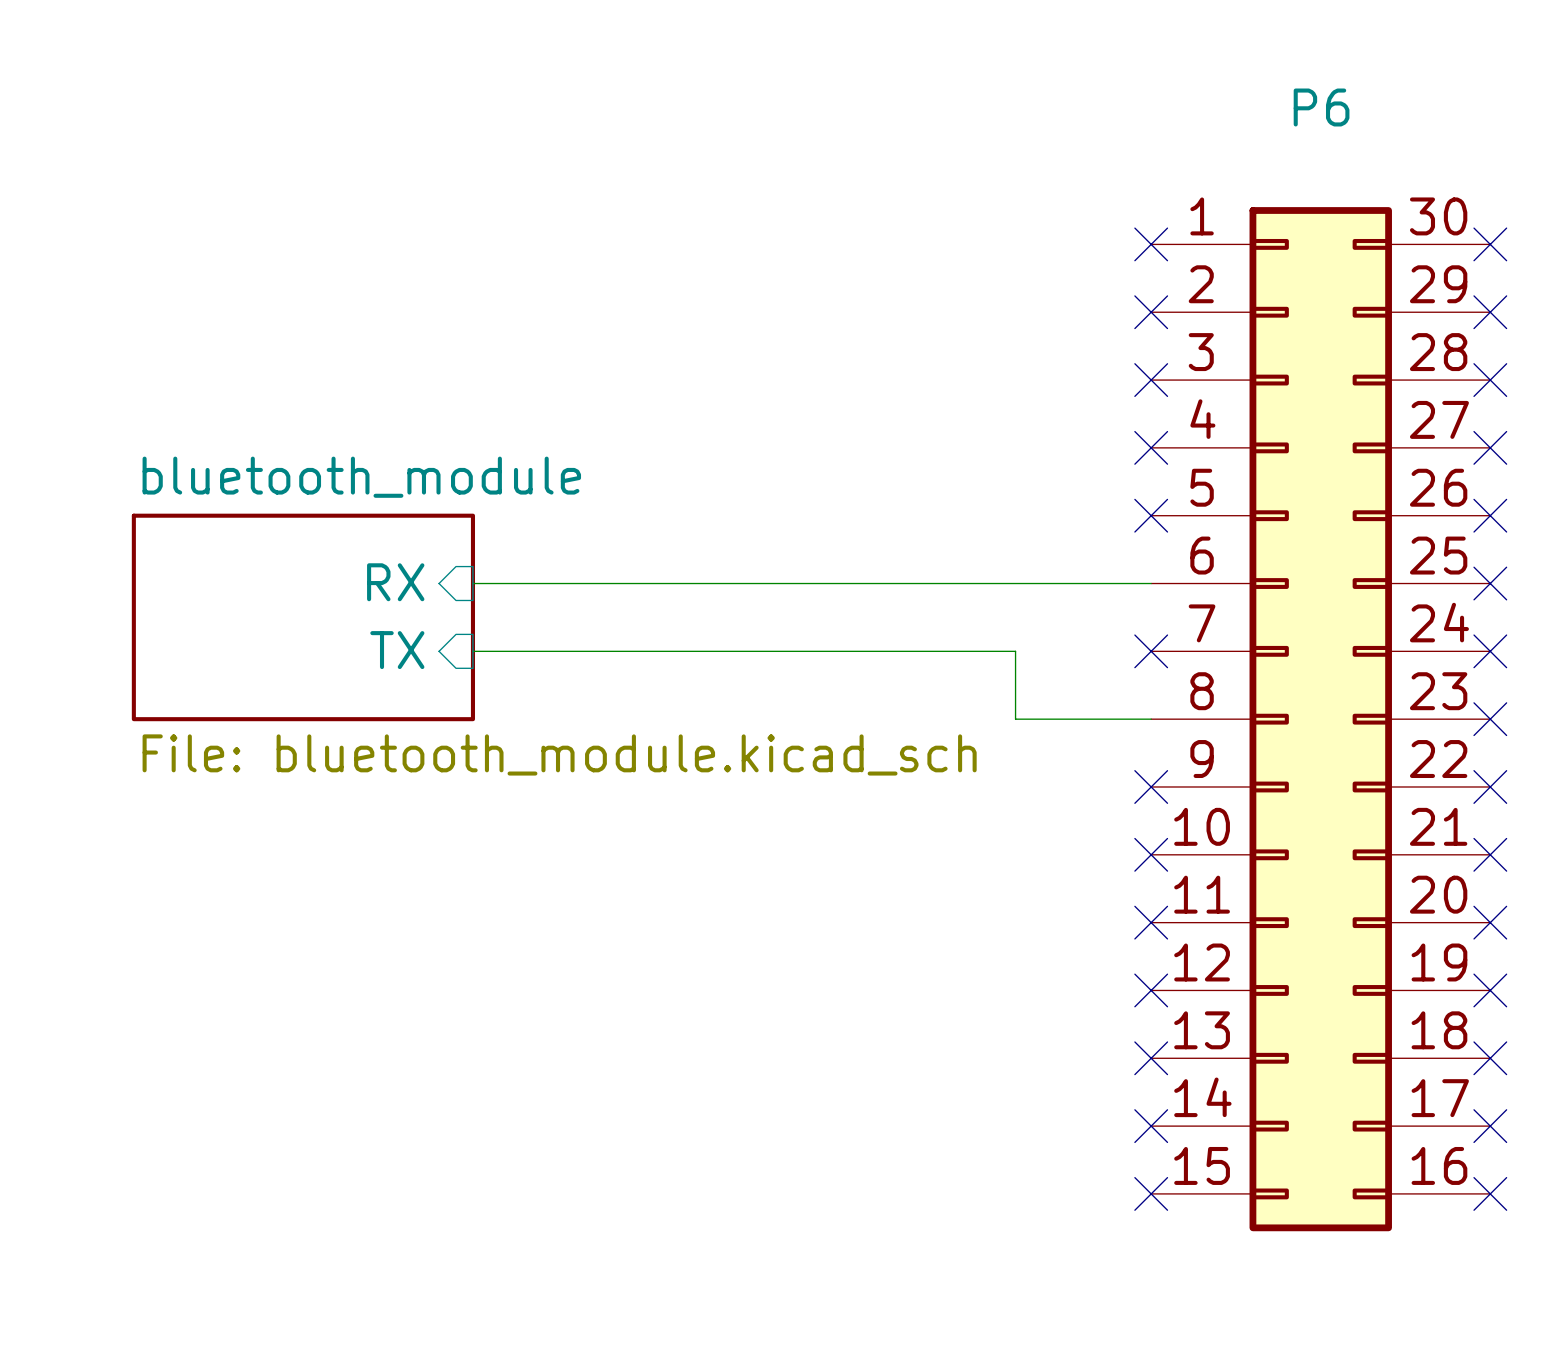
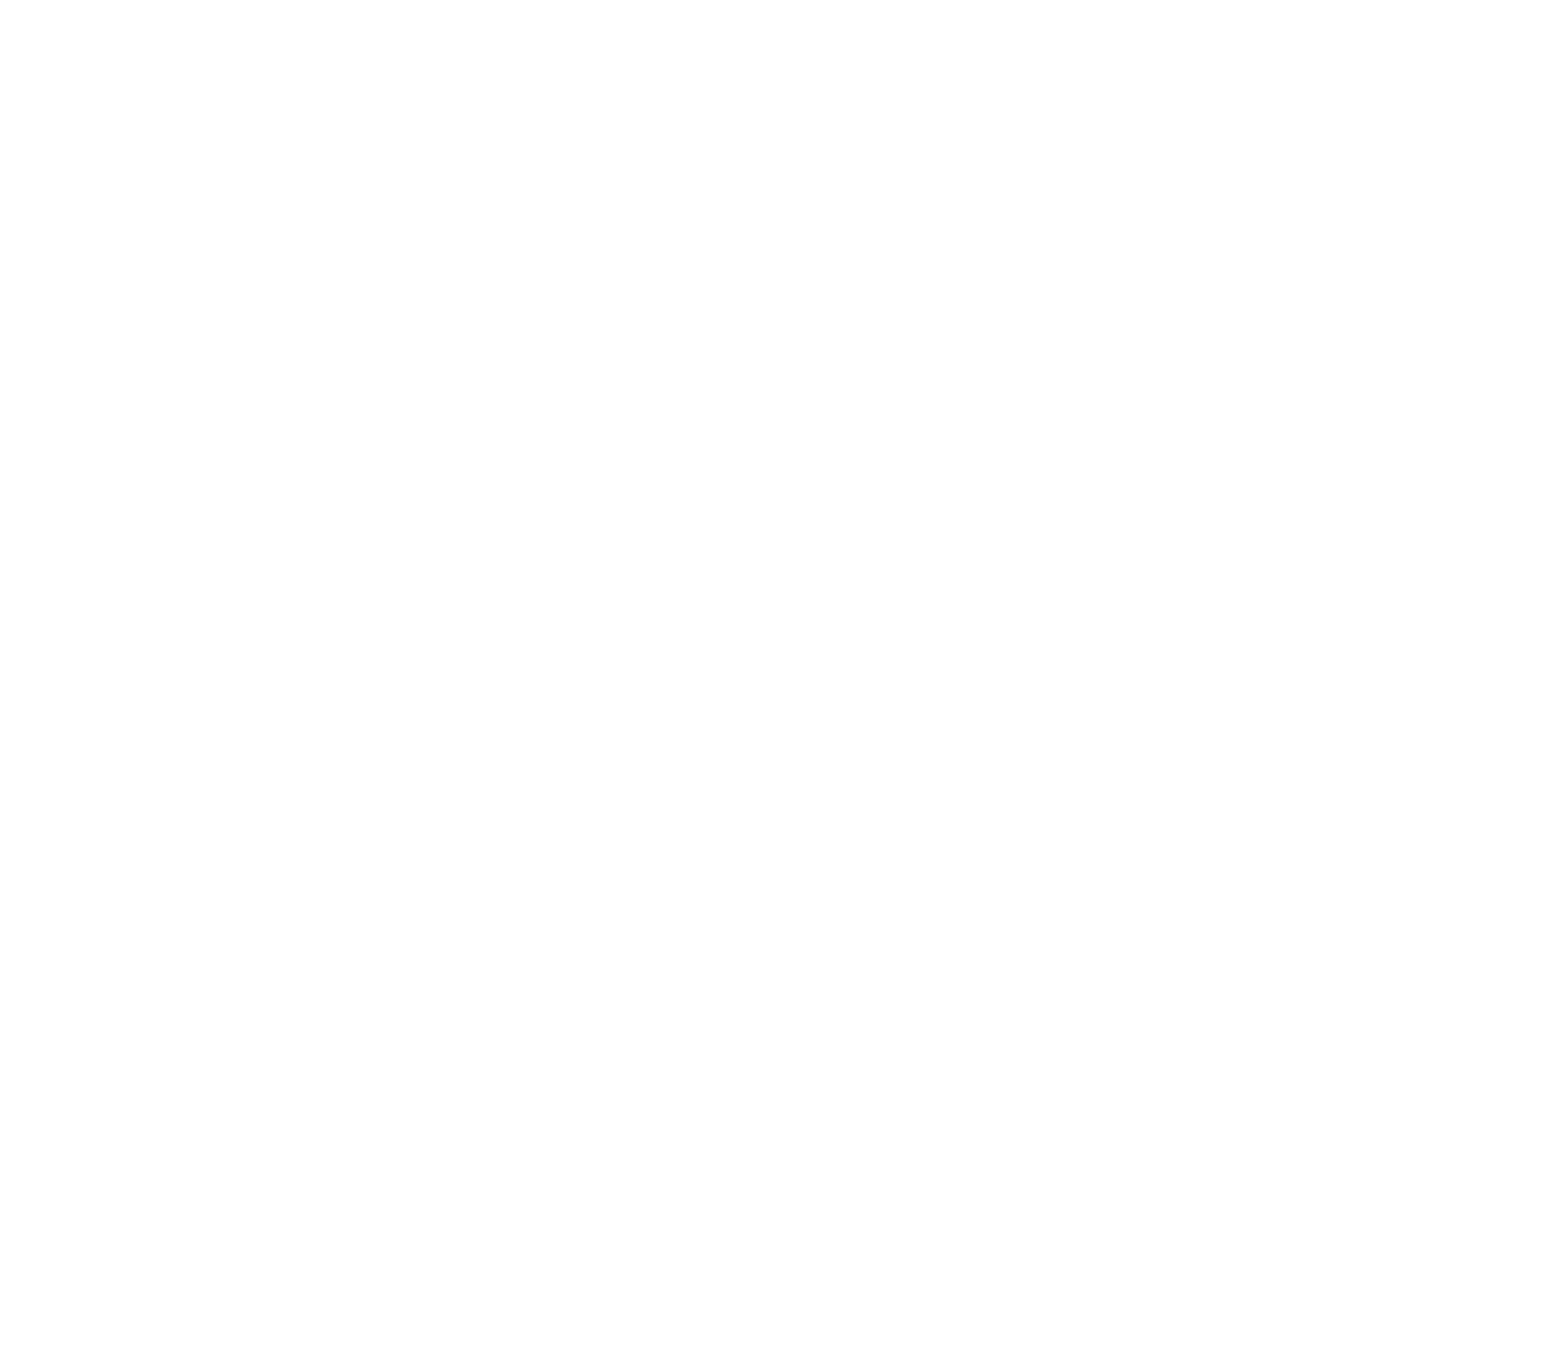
no-connect mark: (1151, 244) -> none
no-connect mark: (1490, 244) -> none
no-connect mark: (1151, 312) -> none
no-connect mark: (1490, 312) -> none
no-connect mark: (1151, 380) -> none
no-connect mark: (1490, 380) -> none
no-connect mark: (1151, 447) -> none
no-connect mark: (1490, 447) -> none
no-connect mark: (1151, 515) -> none
no-connect mark: (1490, 515) -> none
sheet pin: RX (395, 582) -> none
wire: (472, 583) (1151, 583) -> none
no-connect mark: (1490, 583) -> none
sheet bluetooth_module: File: bluetooth_module.kicad_sch (303, 617) -> none
sheet pin: TX (397, 650) -> none
wire: (472, 651) (1015, 651) (1015, 719) (1151, 719) -> none
no-connect mark: (1151, 651) -> none
no-connect mark: (1490, 651) -> none
P6: (1320, 719) -> none
no-connect mark: (1490, 719) -> none
no-connect mark: (1151, 786) -> none
no-connect mark: (1490, 786) -> none
no-connect mark: (1151, 854) -> none
no-connect mark: (1490, 854) -> none
no-connect mark: (1151, 922) -> none
no-connect mark: (1490, 922) -> none
no-connect mark: (1151, 990) -> none
no-connect mark: (1490, 990) -> none
no-connect mark: (1151, 1058) -> none
no-connect mark: (1490, 1058) -> none
no-connect mark: (1151, 1126) -> none
no-connect mark: (1490, 1126) -> none
no-connect mark: (1151, 1193) -> none
no-connect mark: (1490, 1193) -> none

